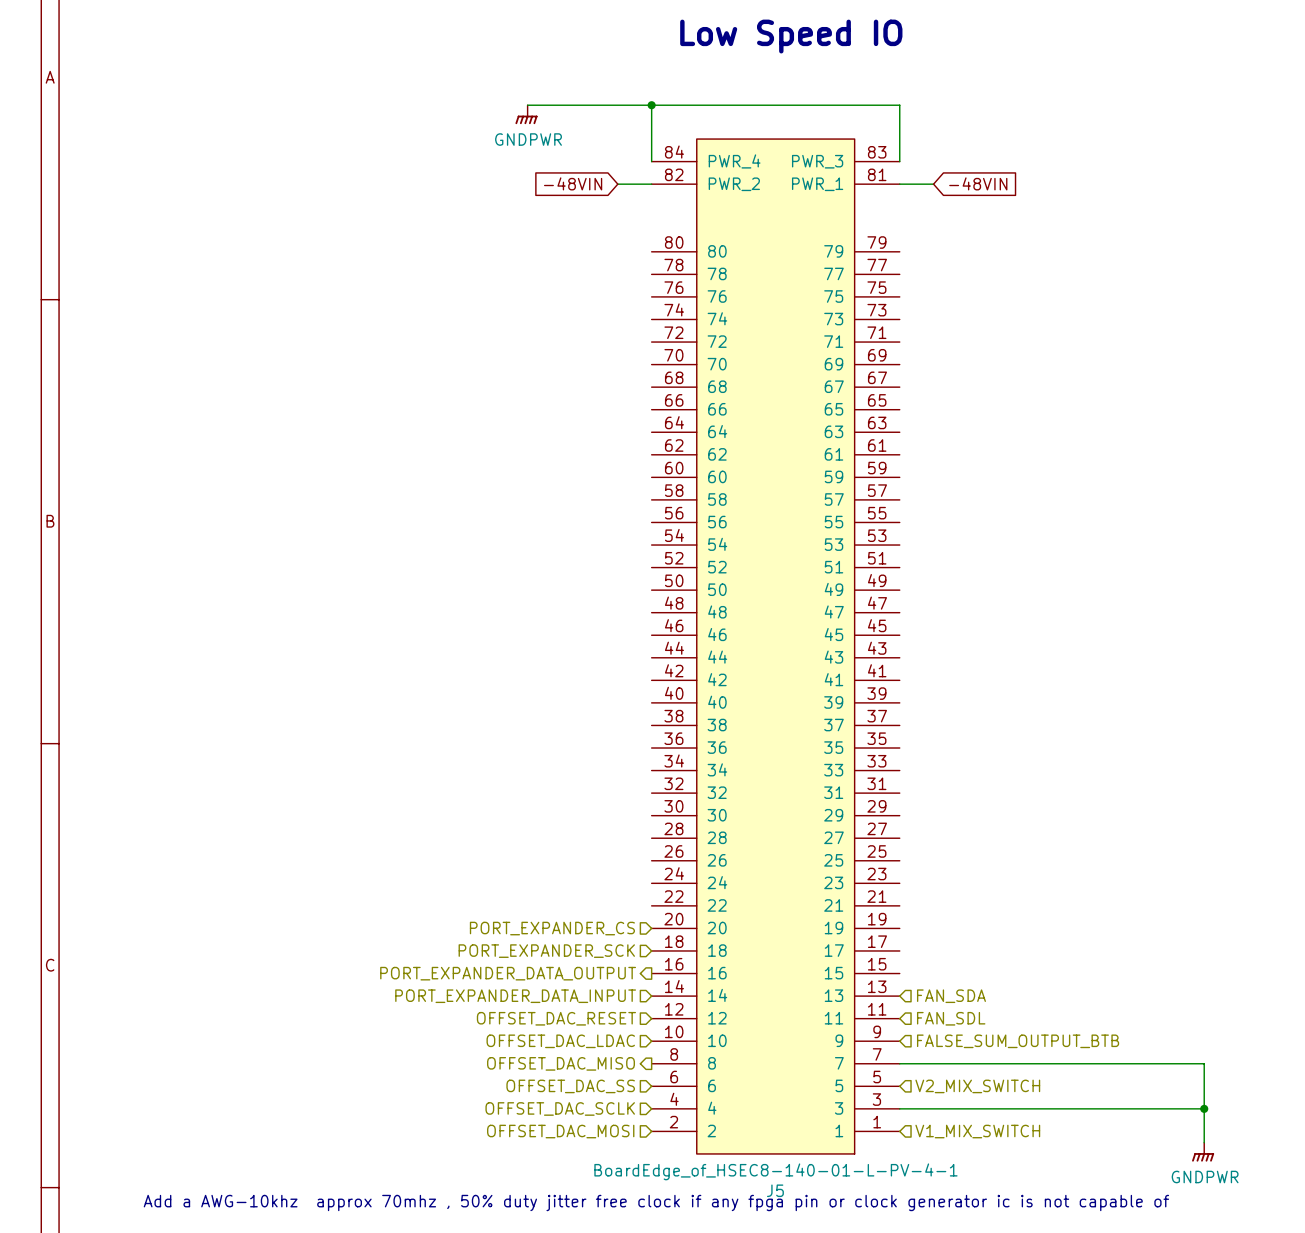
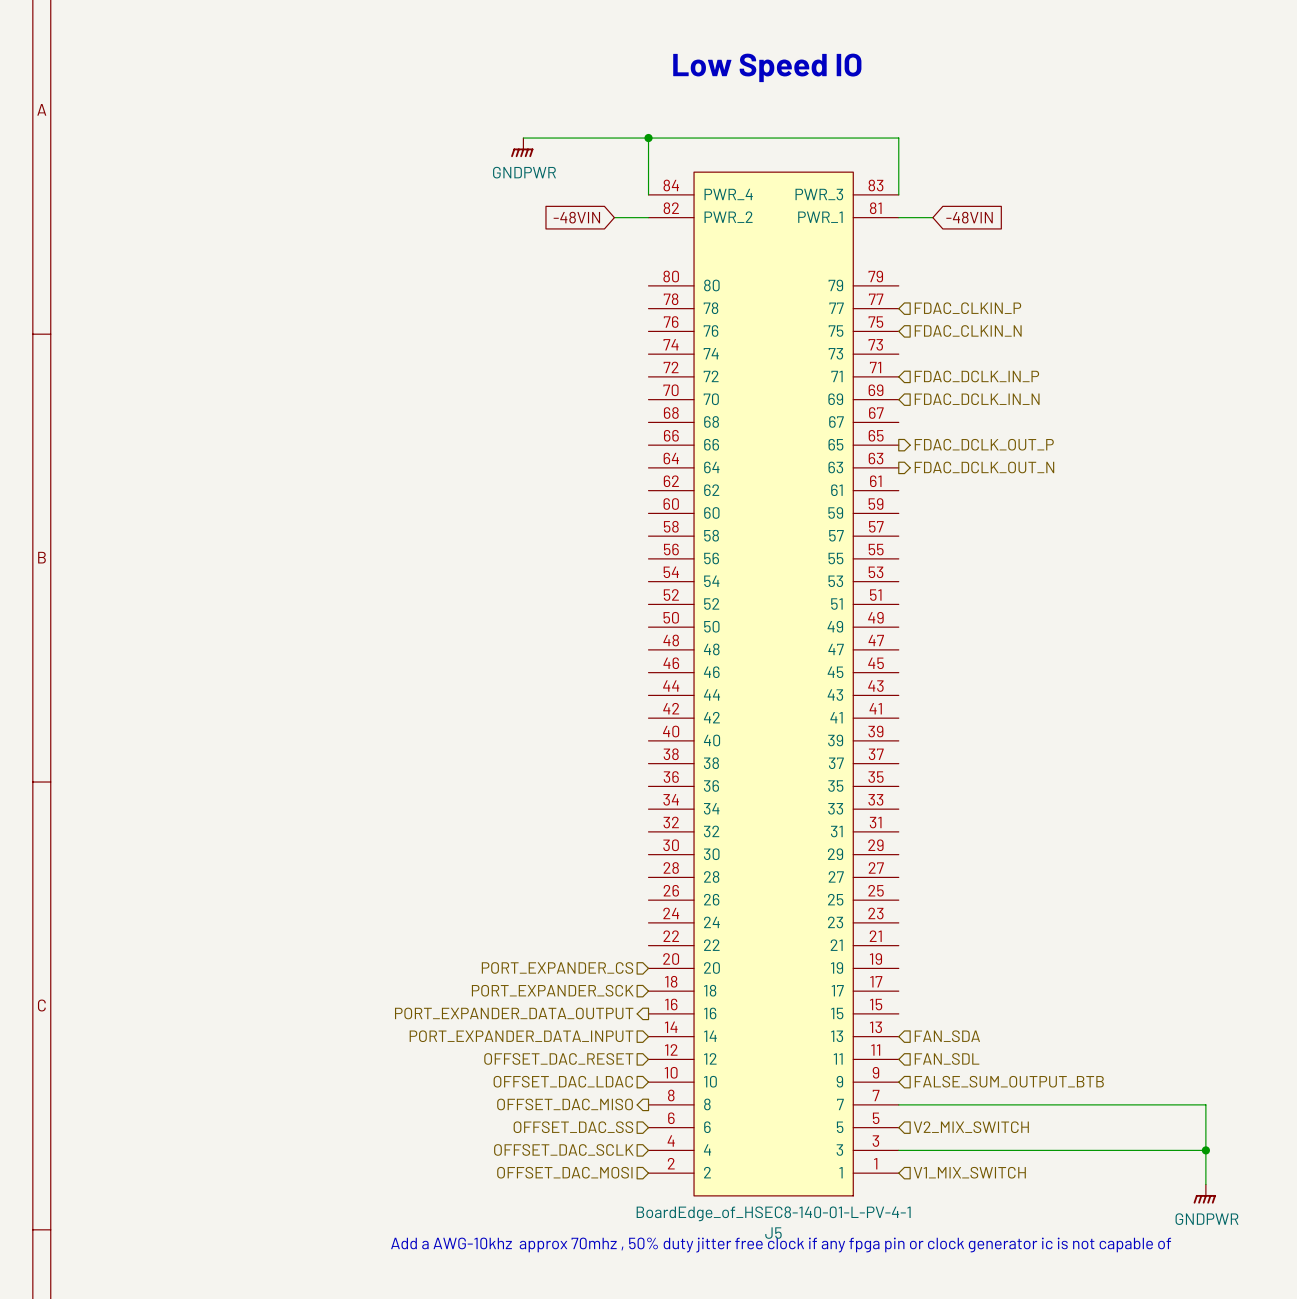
hierarchical label: none -> FDAC_CLKIN_P (967, 308)
hierarchical label: none -> FDAC_CLKIN_N (968, 330)
hierarchical label: none -> FDAC_DCLK_IN_P (976, 376)
hierarchical label: none -> FDAC_DCLK_IN_N (977, 399)
hierarchical label: none -> FDAC_DCLK_OUT_P (984, 444)
hierarchical label: none -> FDAC_DCLK_OUT_N (984, 467)

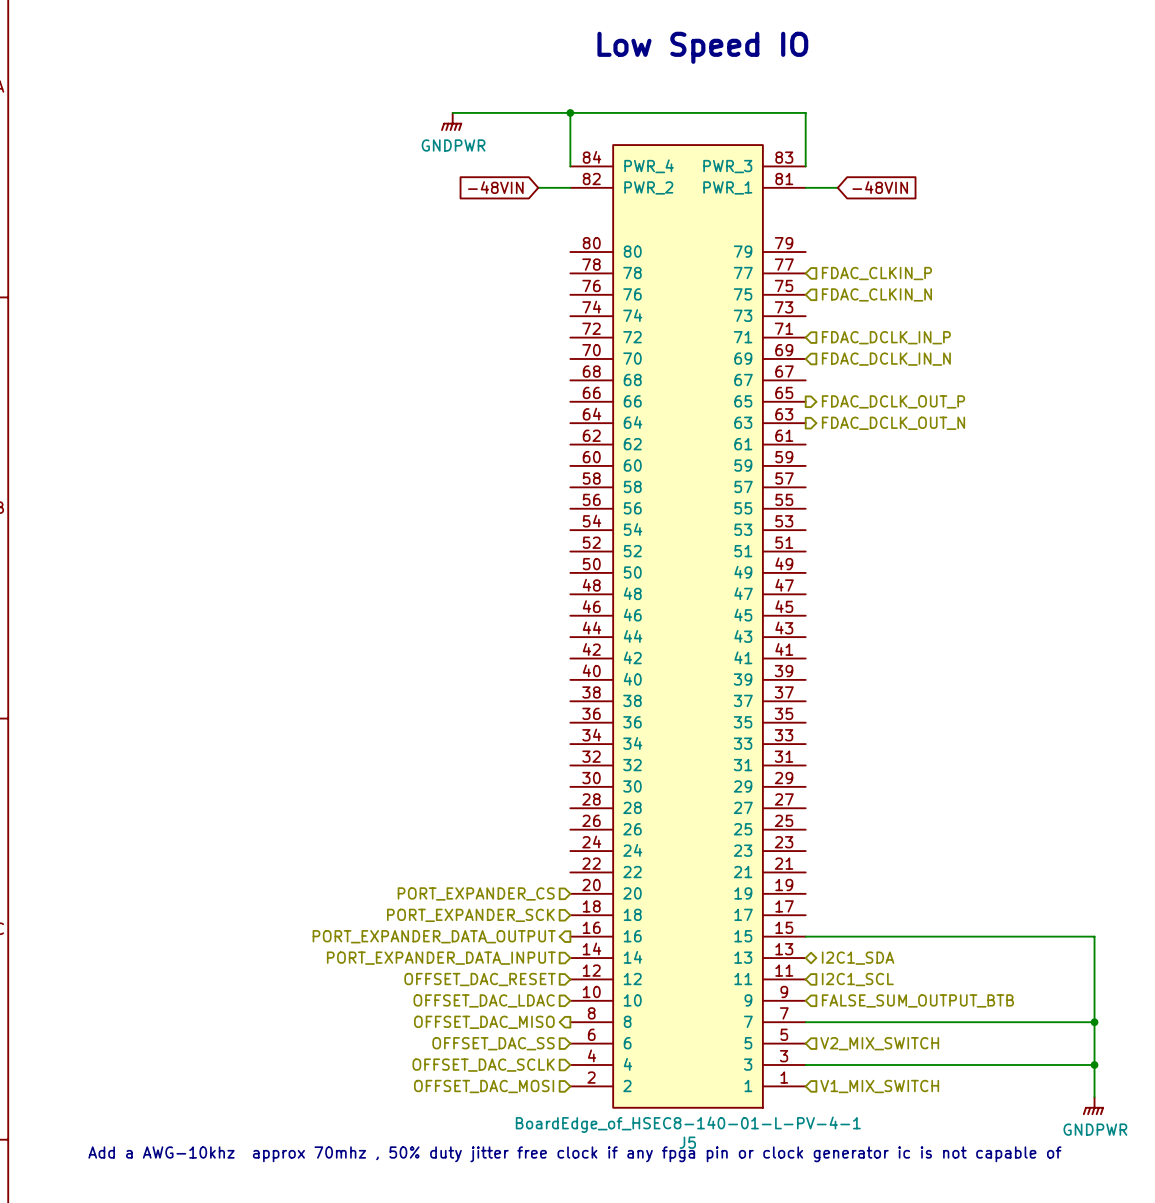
wire: none -> (805, 936) (1094, 936) (1094, 1022)
hierarchical label shape: input (947, 1036) -> bidirectional (858, 958)
hierarchical label: FAN_SDA (947, 1036) -> I2C1_SDA (858, 958)
hierarchical label: FAN_SDL (947, 1058) -> I2C1_SCL (857, 979)
junction: none -> (1094, 1022)

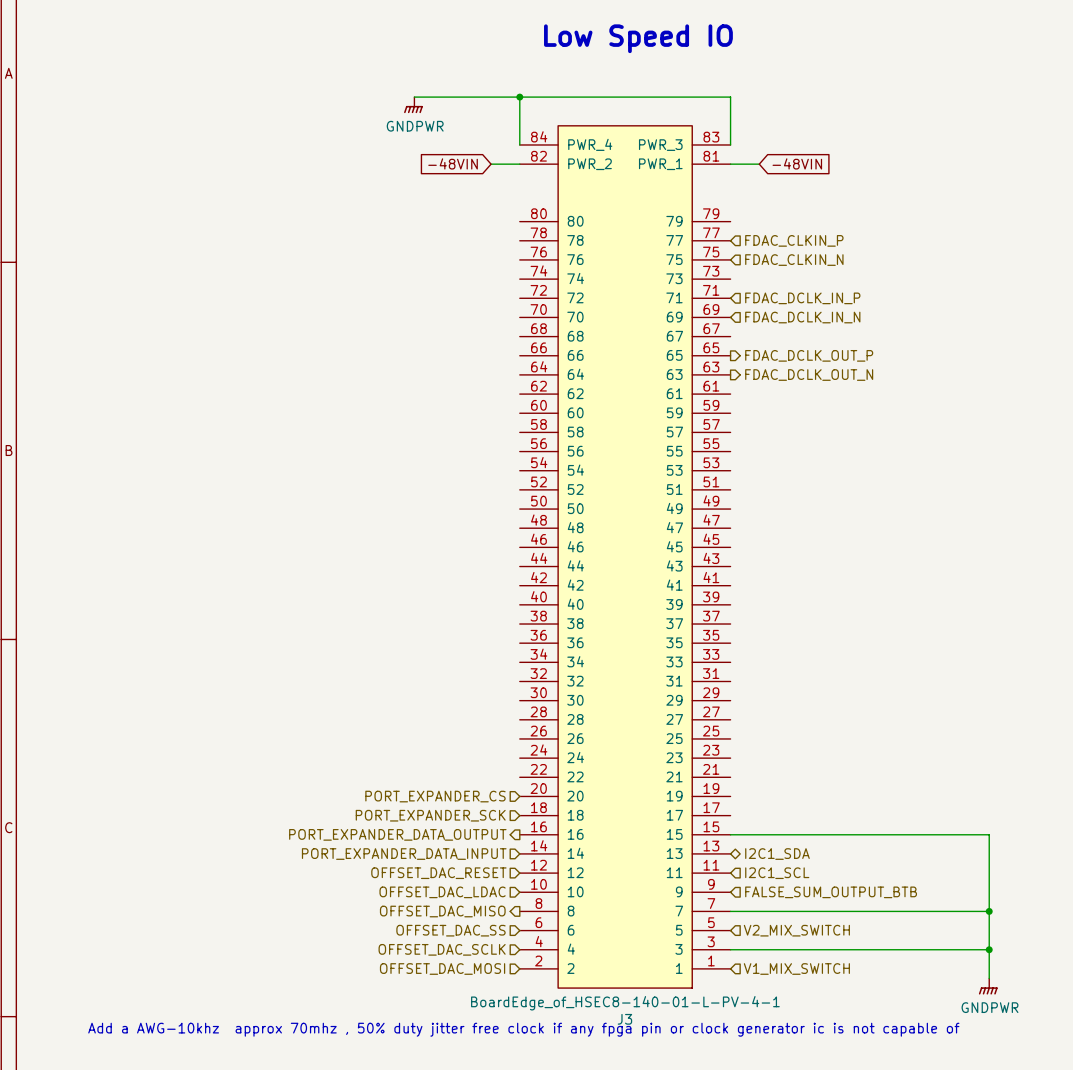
J5 name: J5 (687, 1142) -> J3 (624, 1019)

